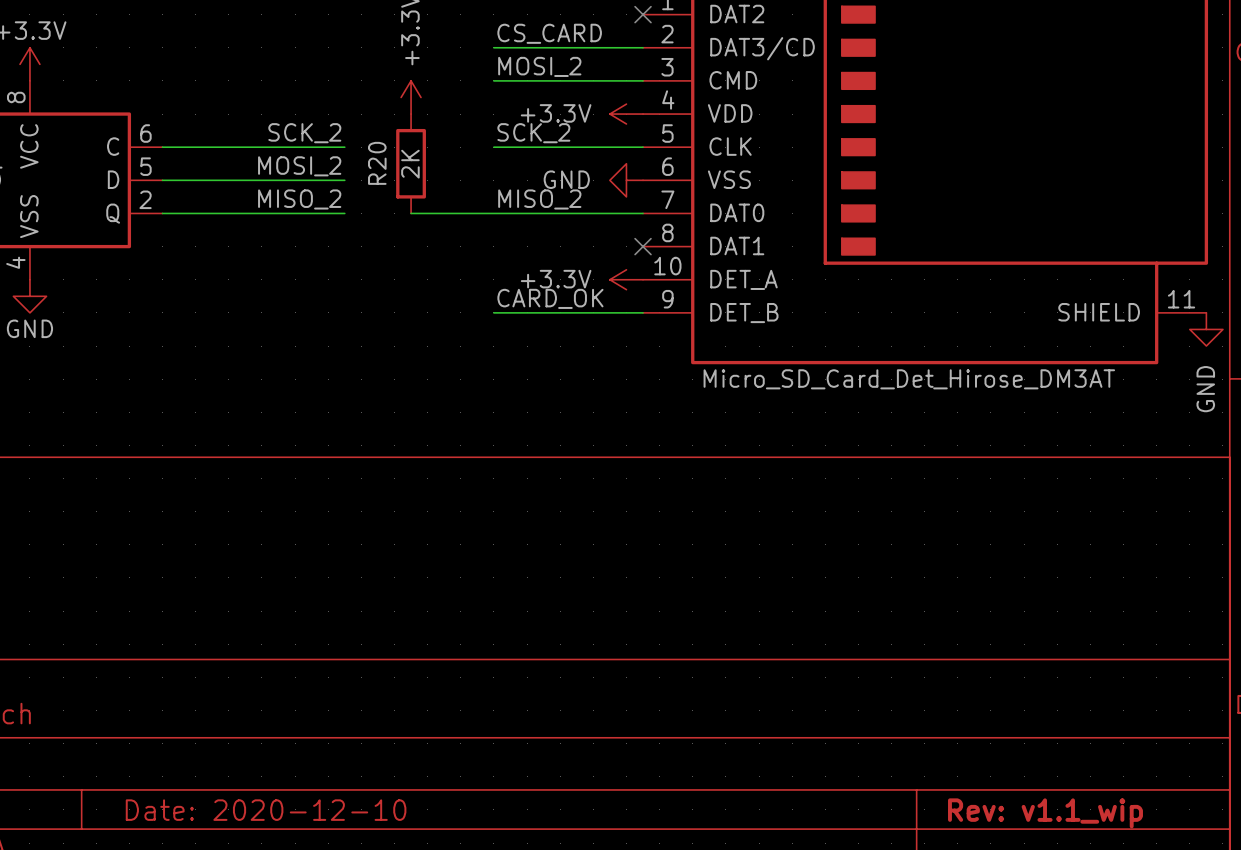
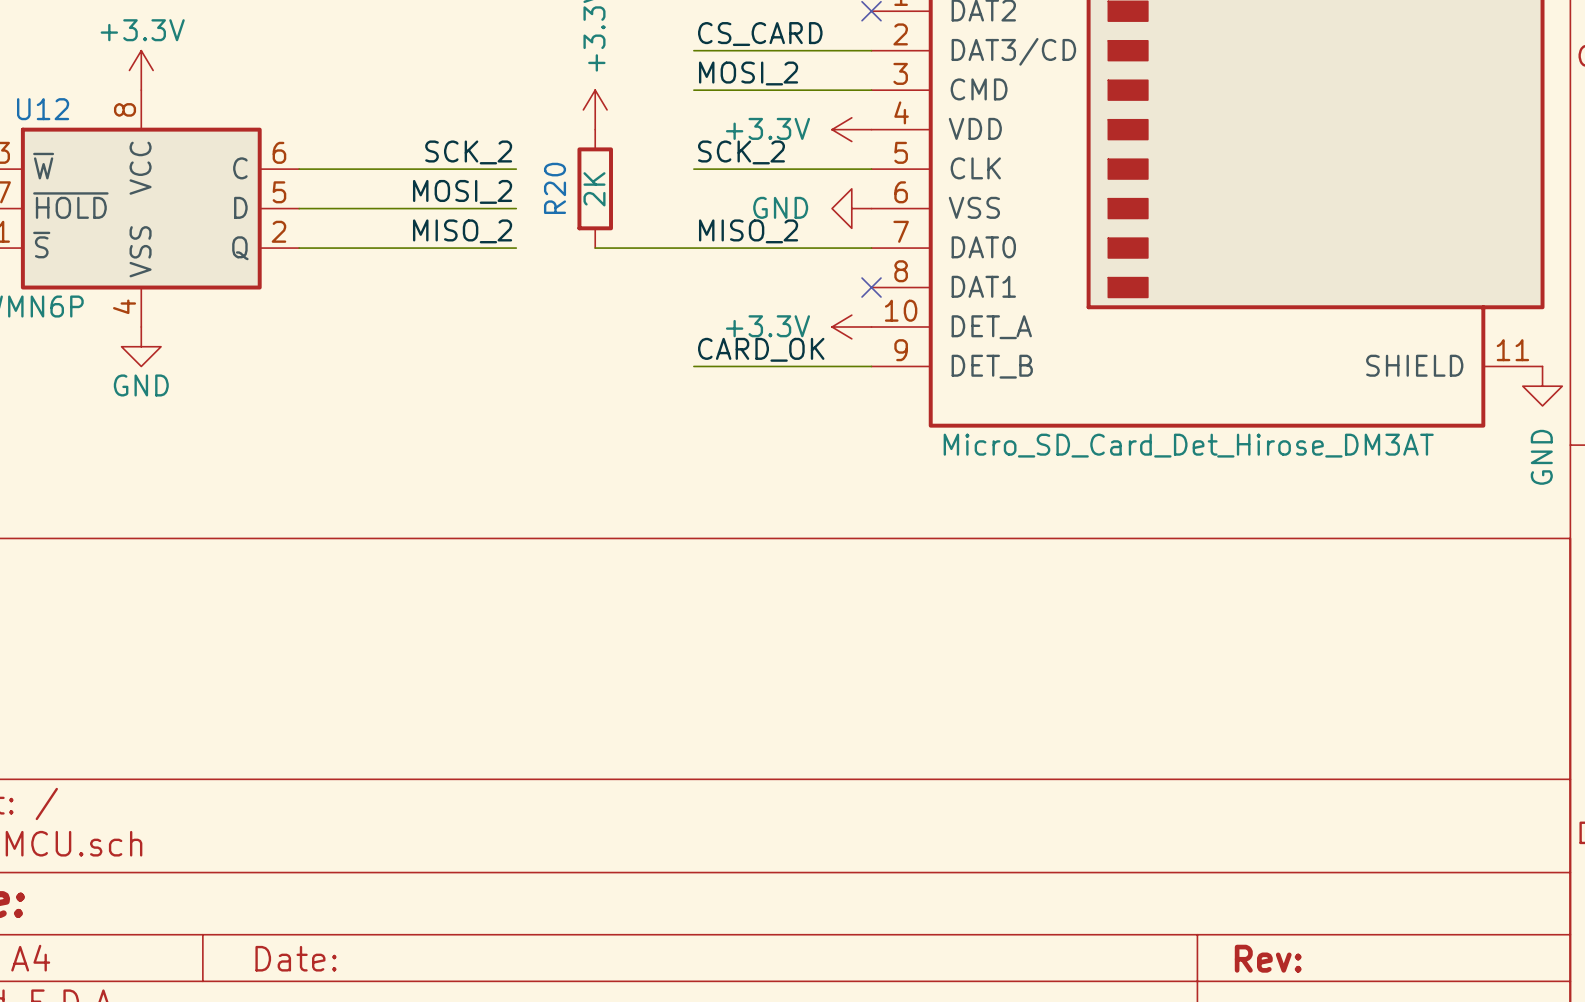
title block: Date: 2020-12-10 (266, 810) -> Date: (296, 958)
title block: Rev: v1.1_wip (1045, 813) -> Rev: (1268, 958)

